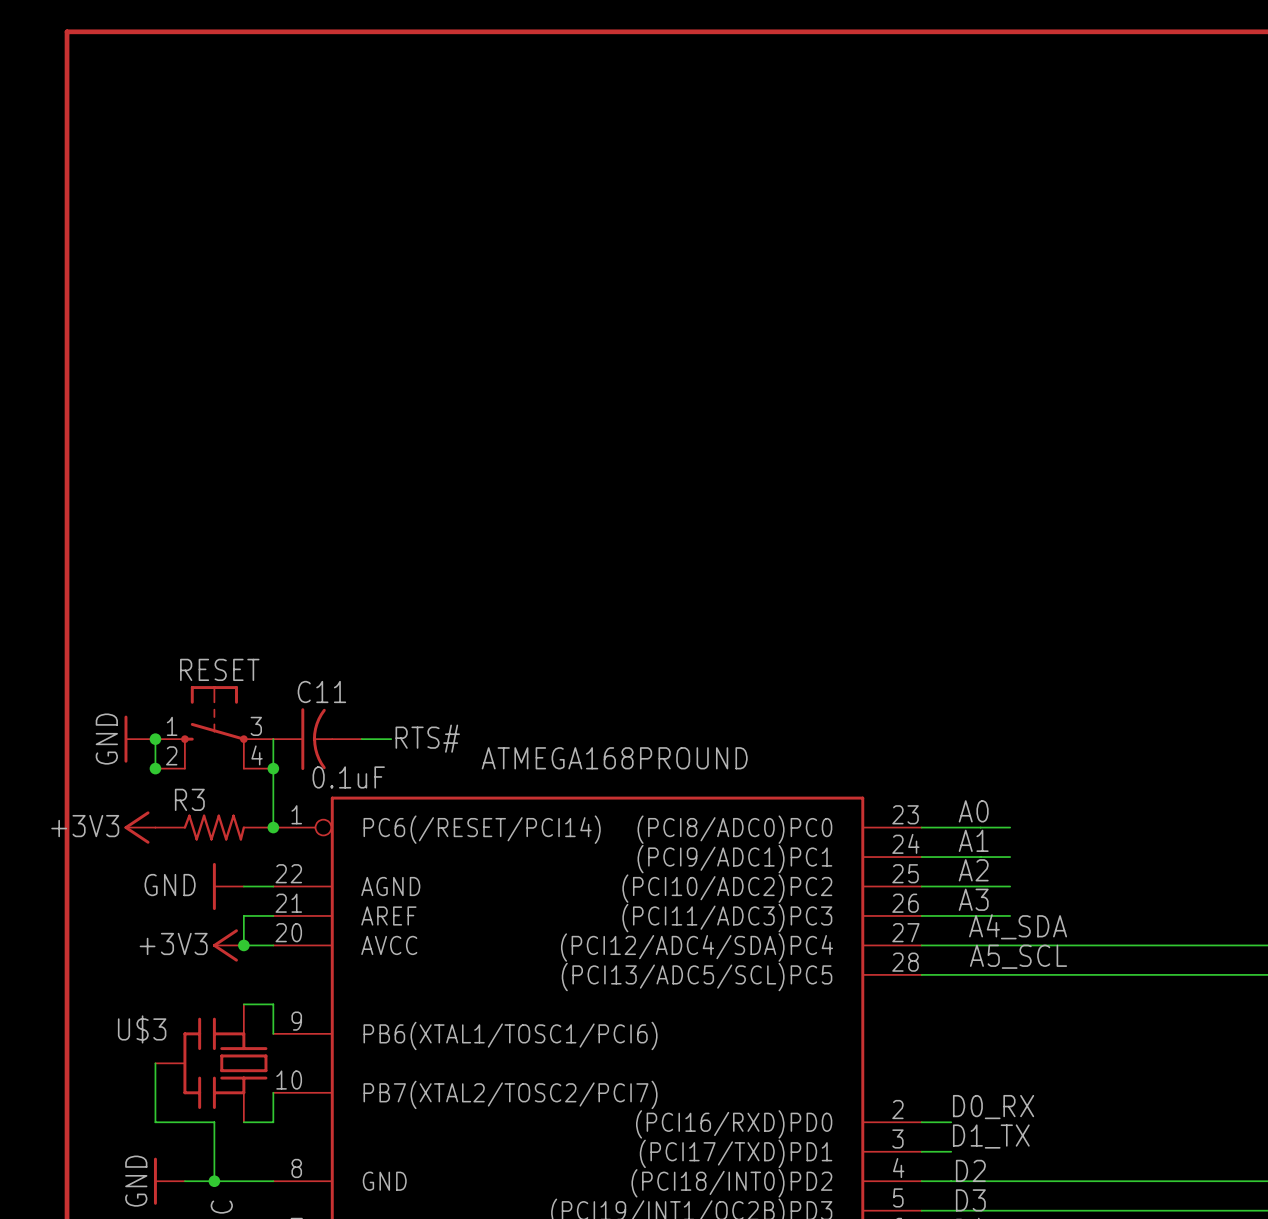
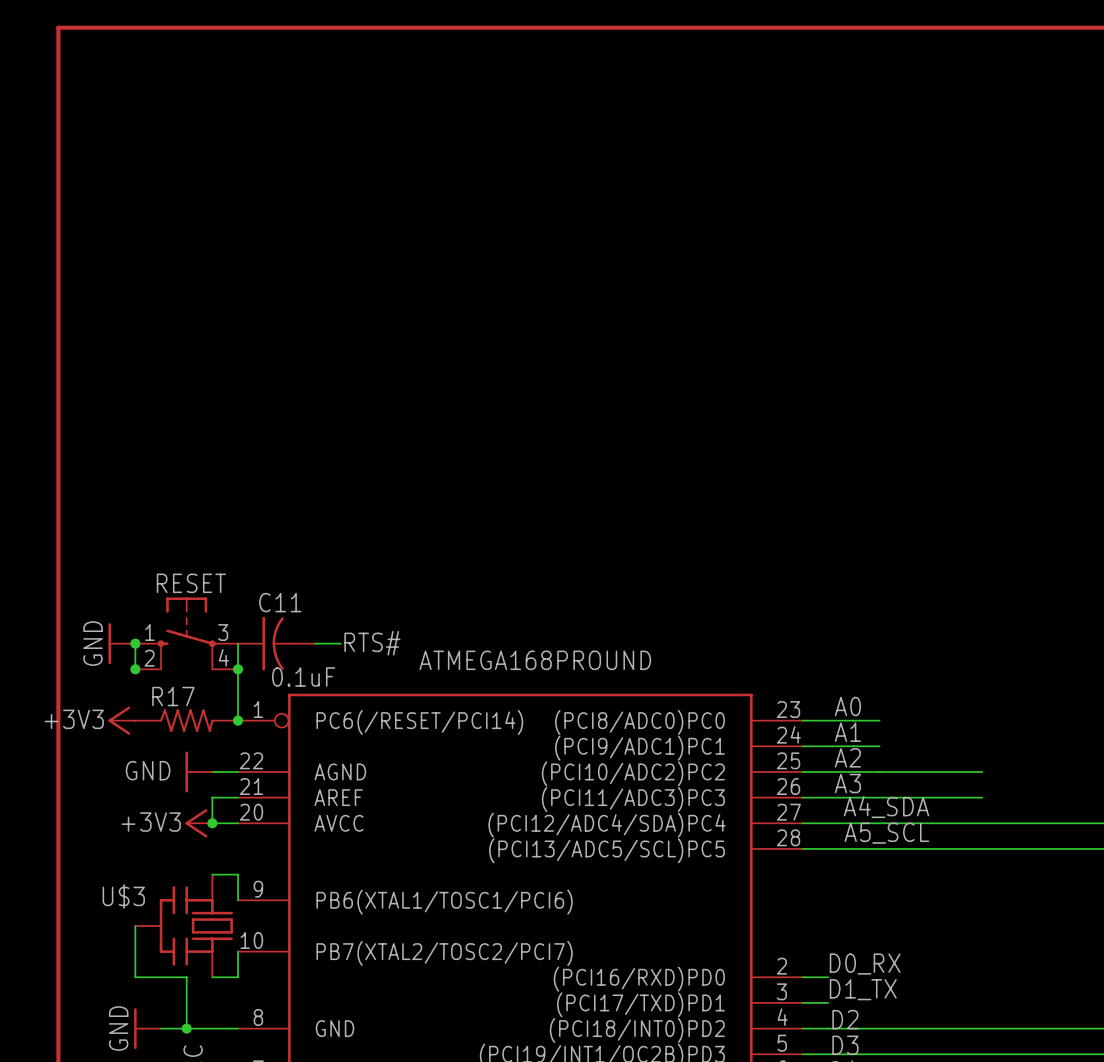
R3 name: R3 (189, 799) -> R17 (173, 696)
wire: none -> (879, 771) (982, 771)
wire: none -> (879, 797) (982, 797)

